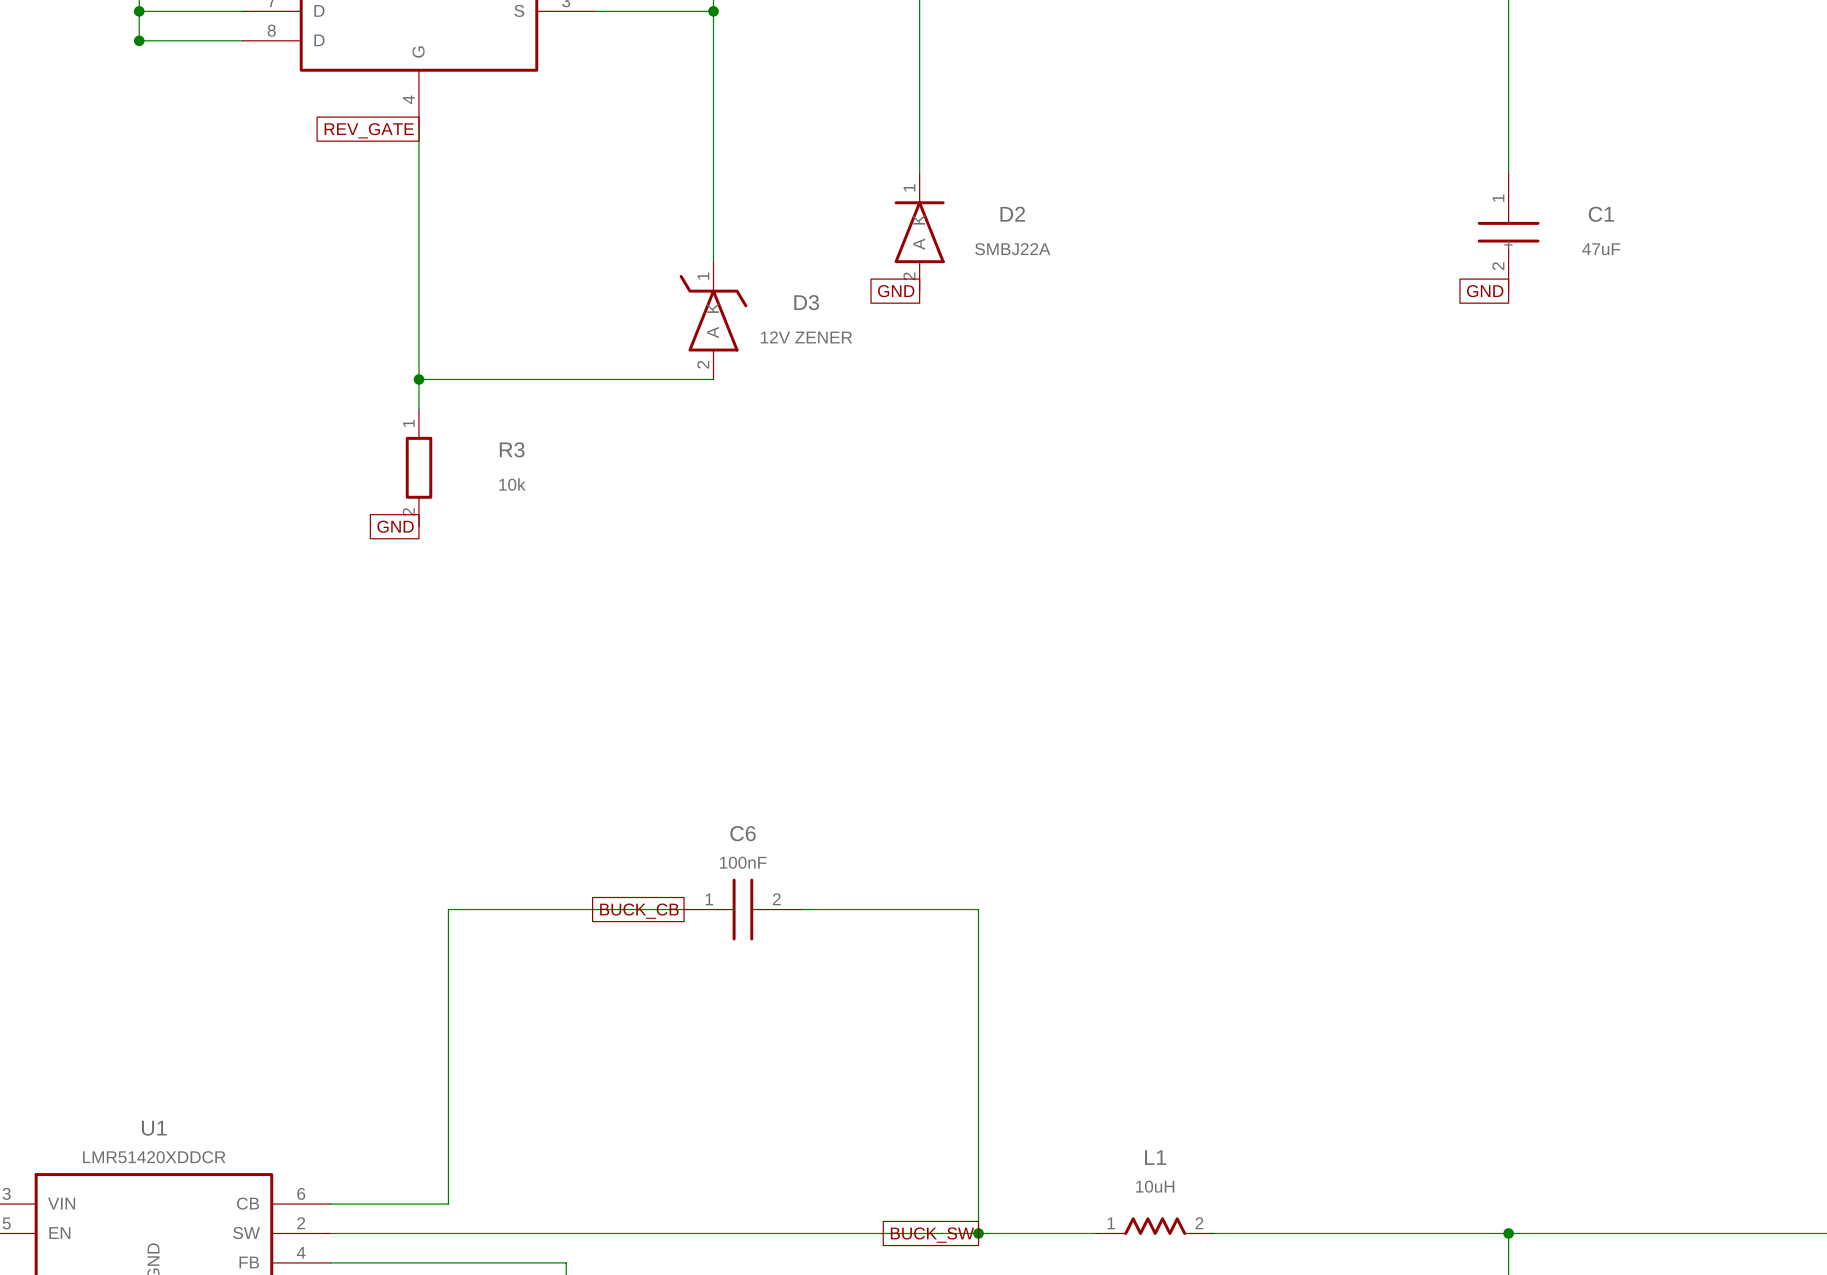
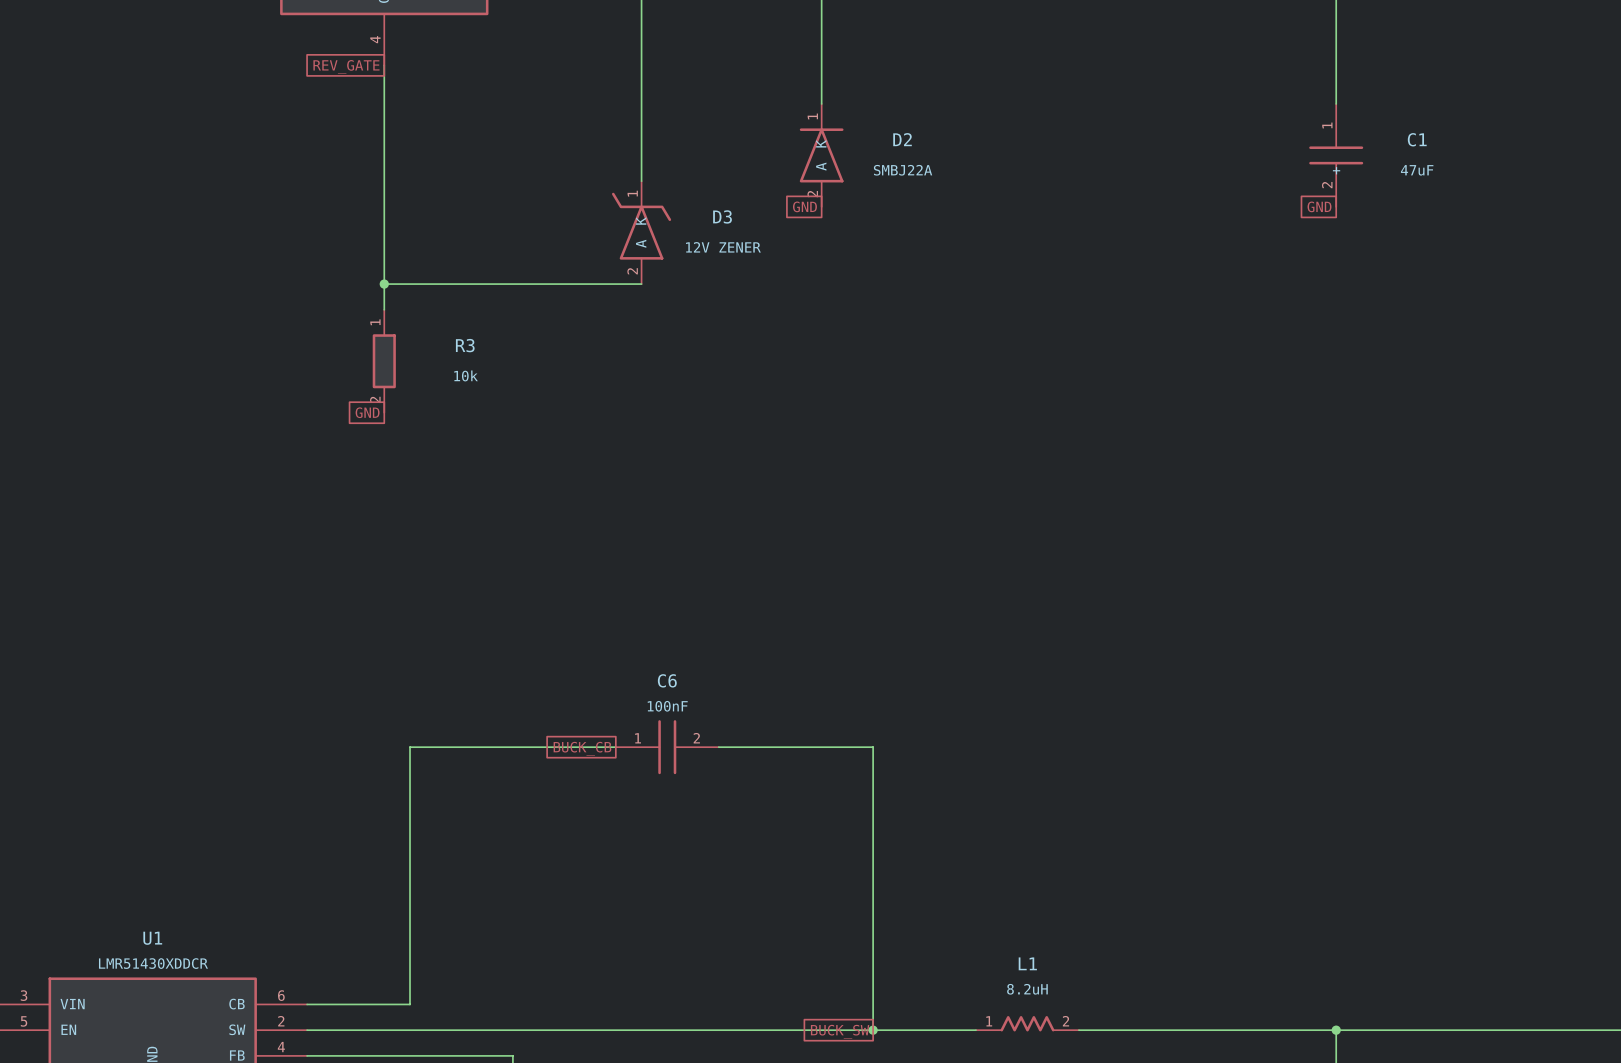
U1 value: LMR51420XDDCR (154, 1157) -> LMR51430XDDCR (153, 963)
L1 value: 10uH (1155, 1186) -> 8.2uH (1027, 989)

